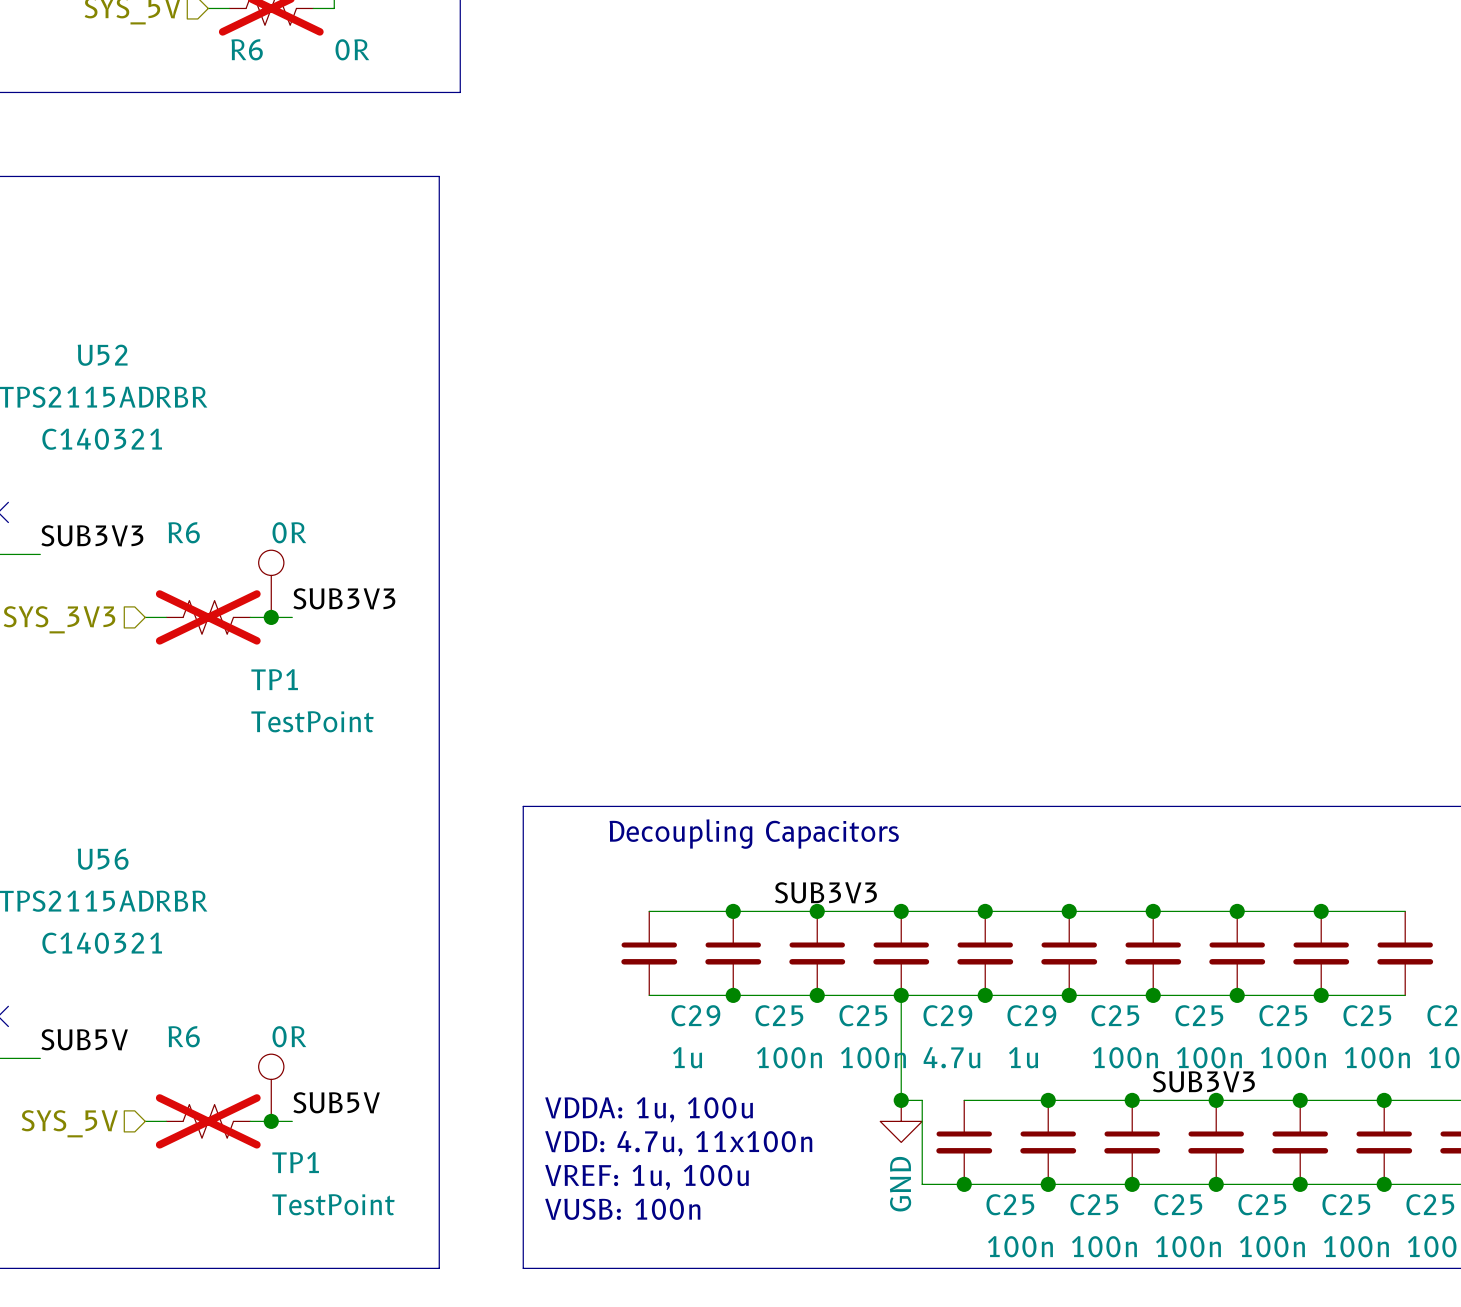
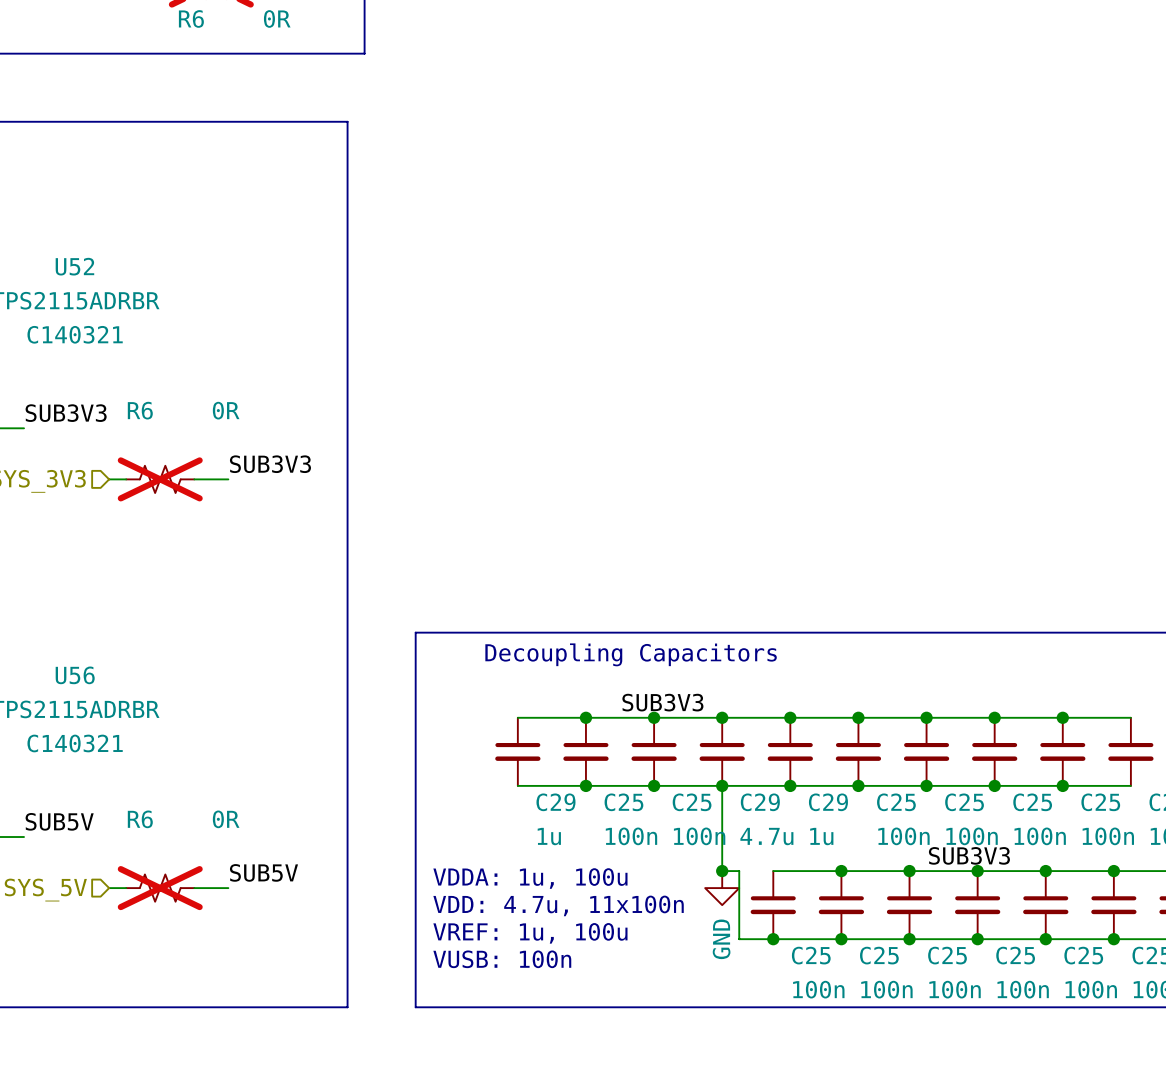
TP1: TestPoint (271, 583) -> none
junction: (271, 617) -> none
TP1: TestPoint (271, 1087) -> none
junction: (271, 1121) -> none

